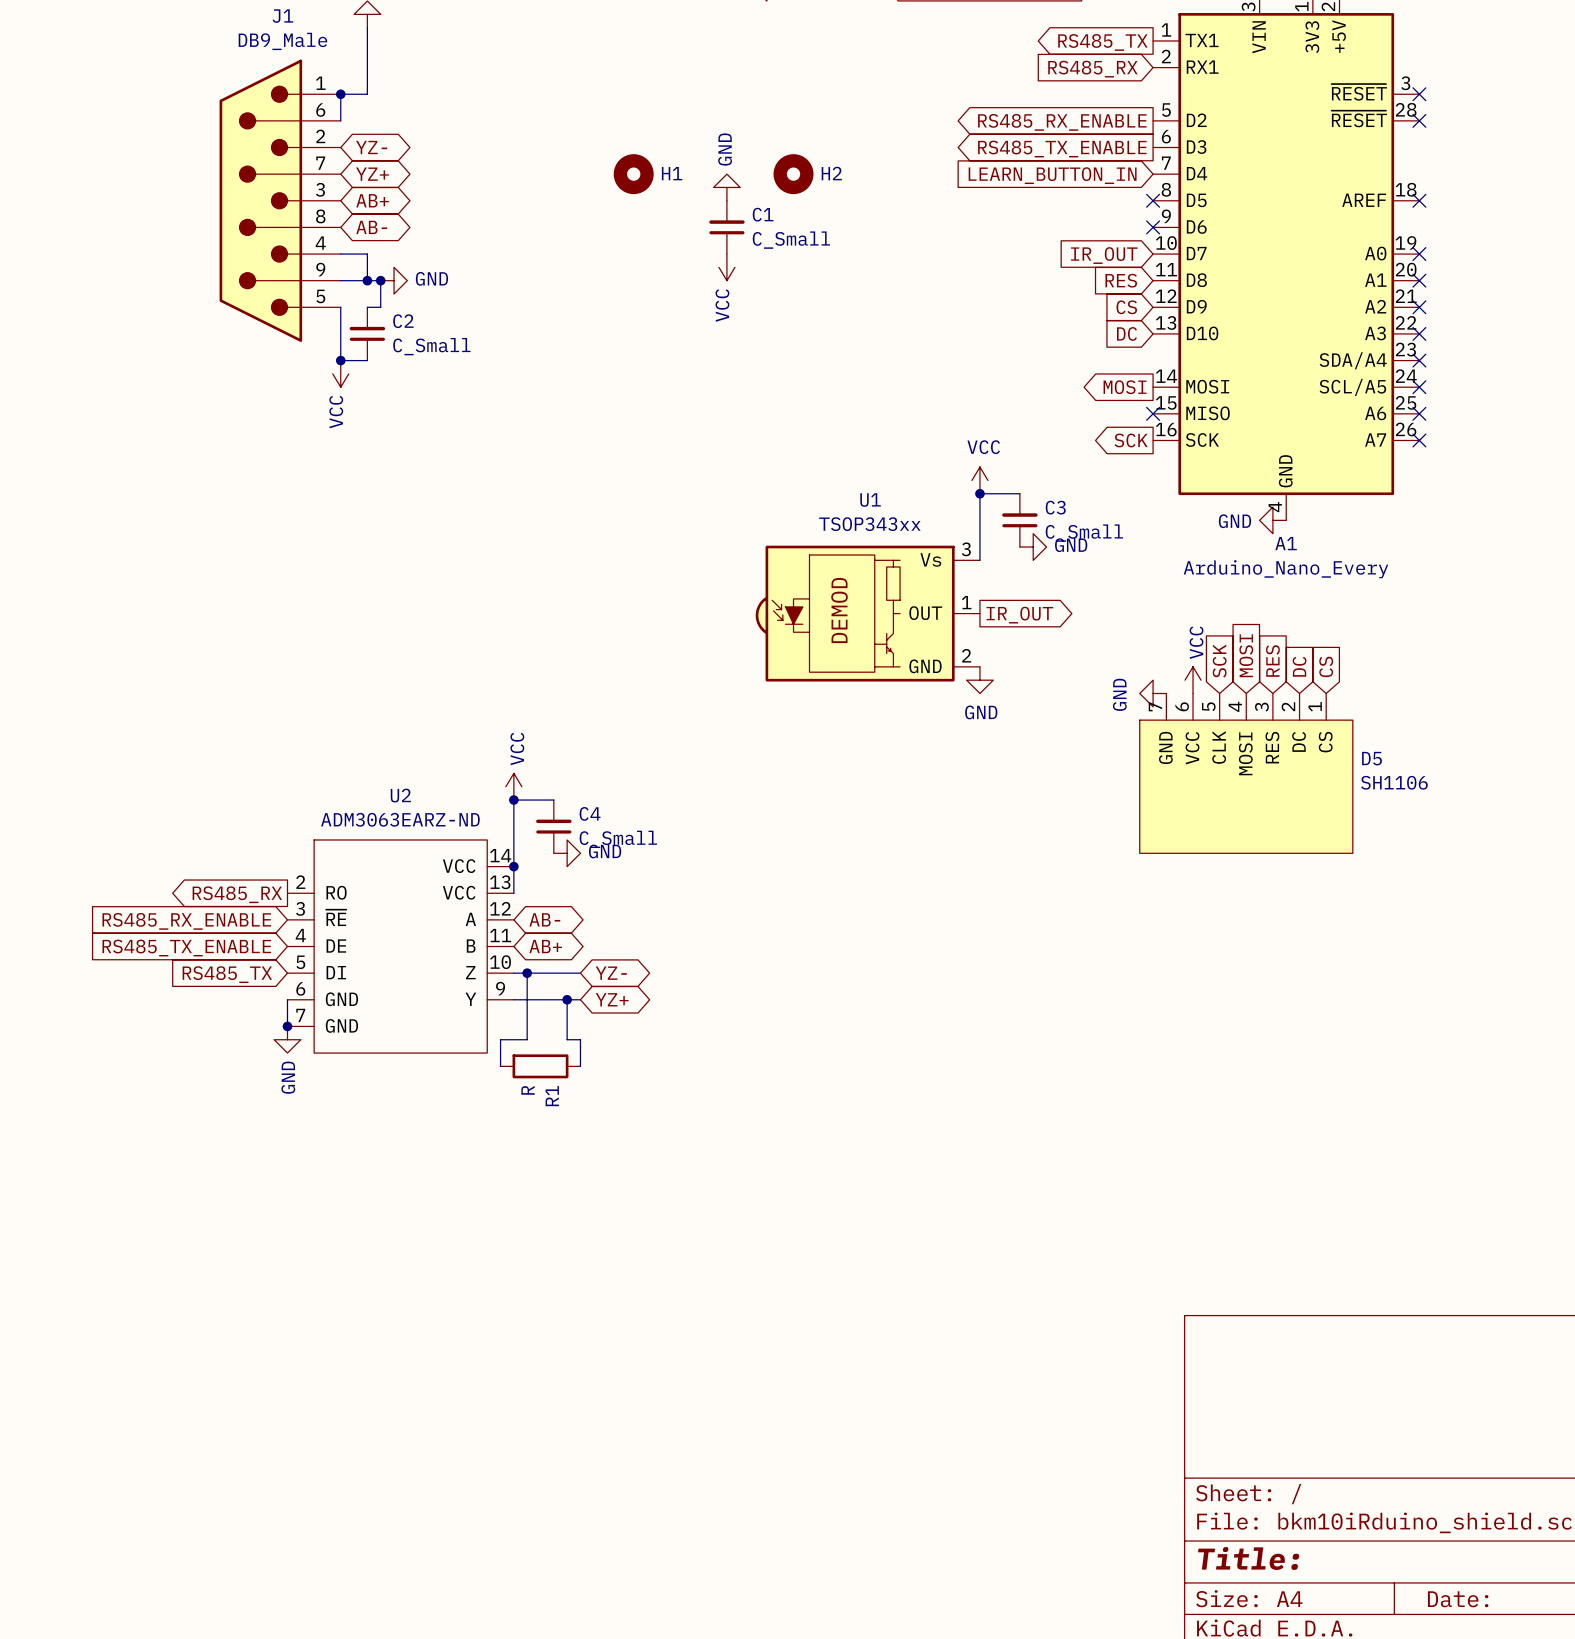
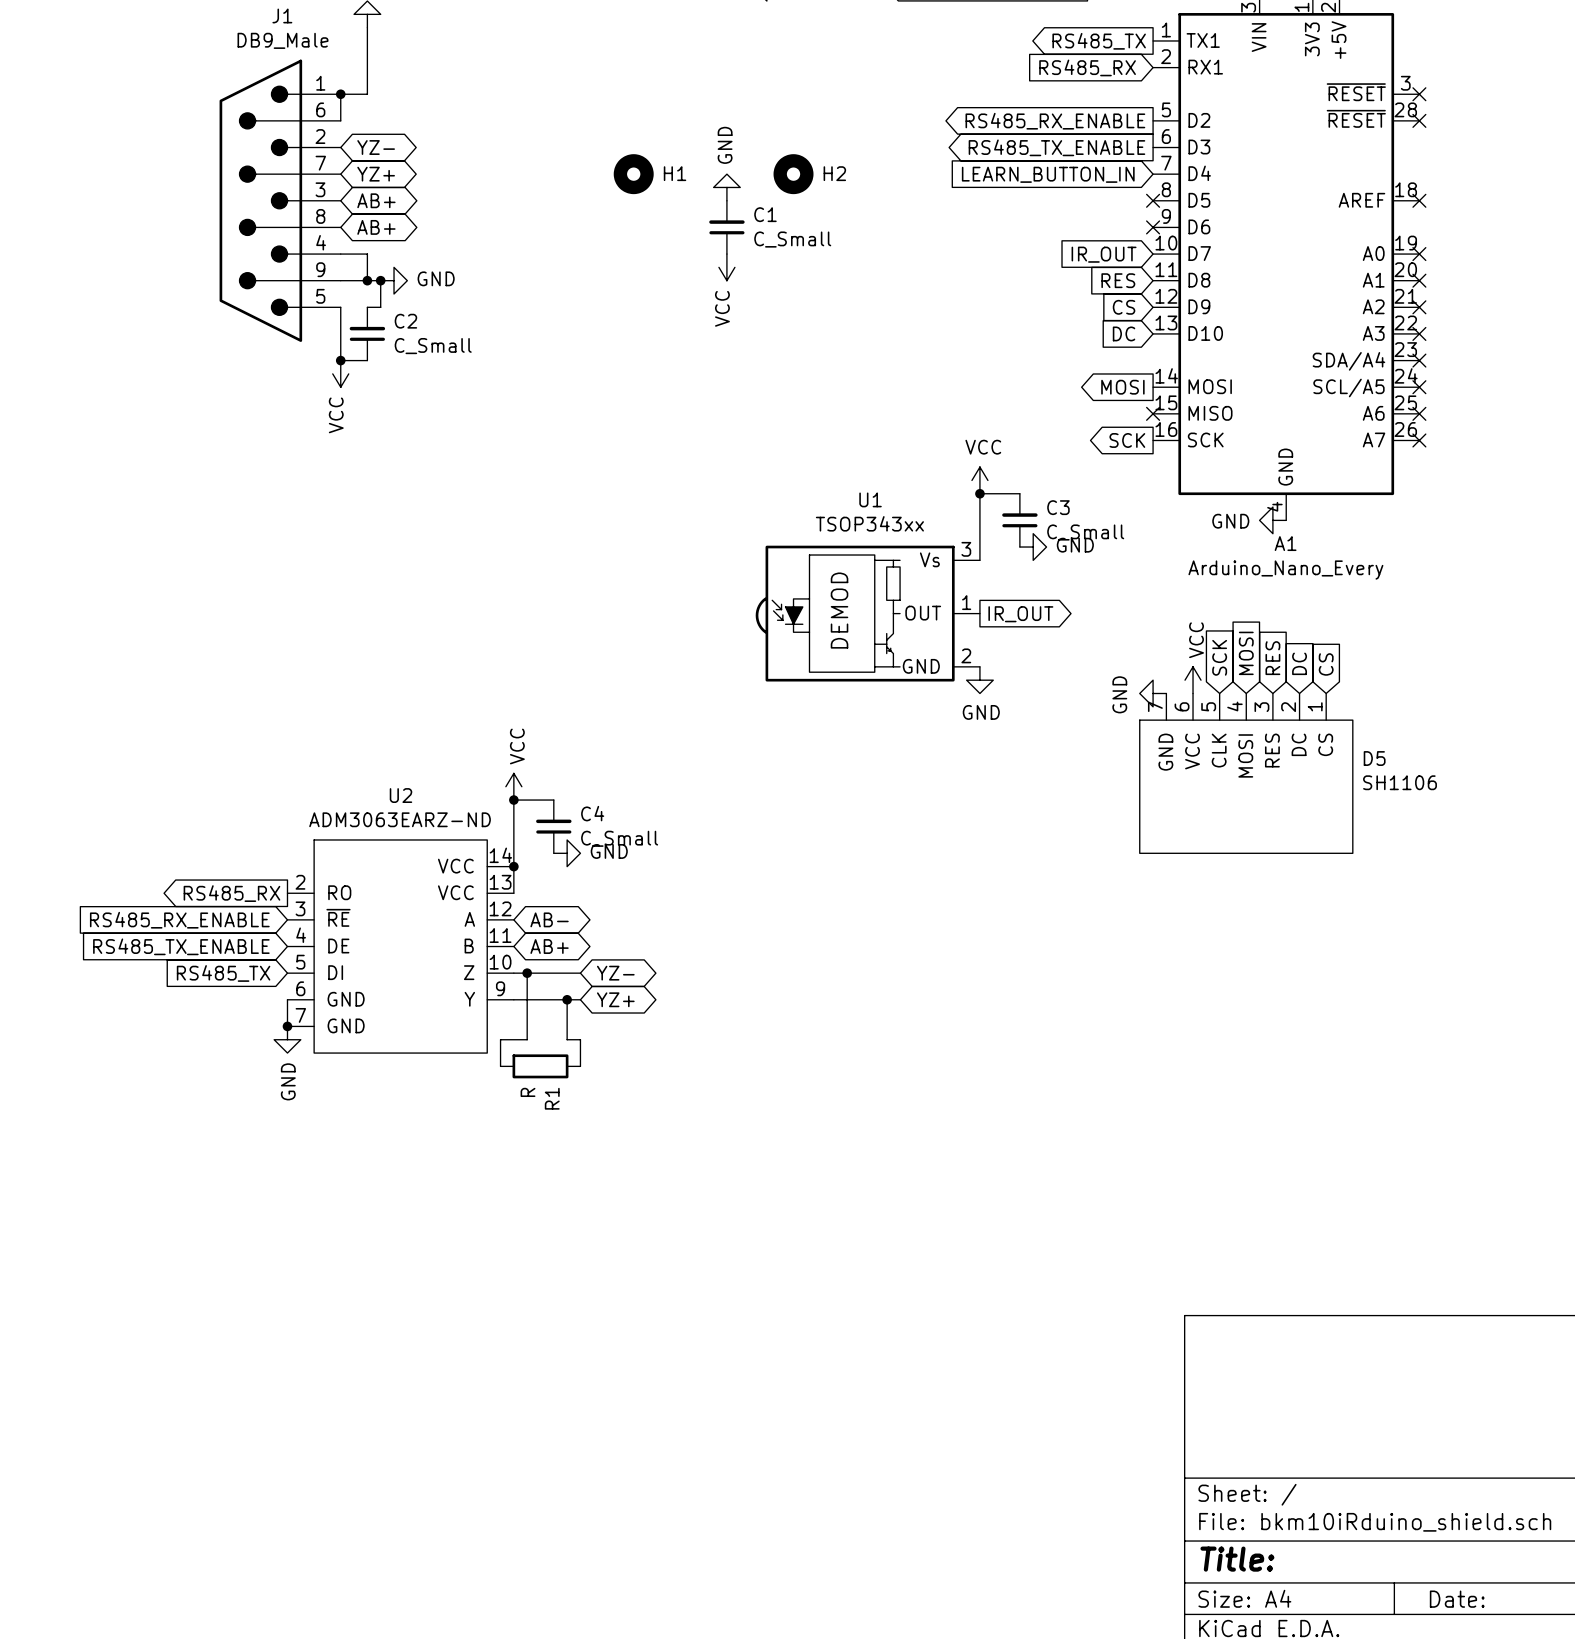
global label: AB- (371, 227) -> AB+ (376, 227)

